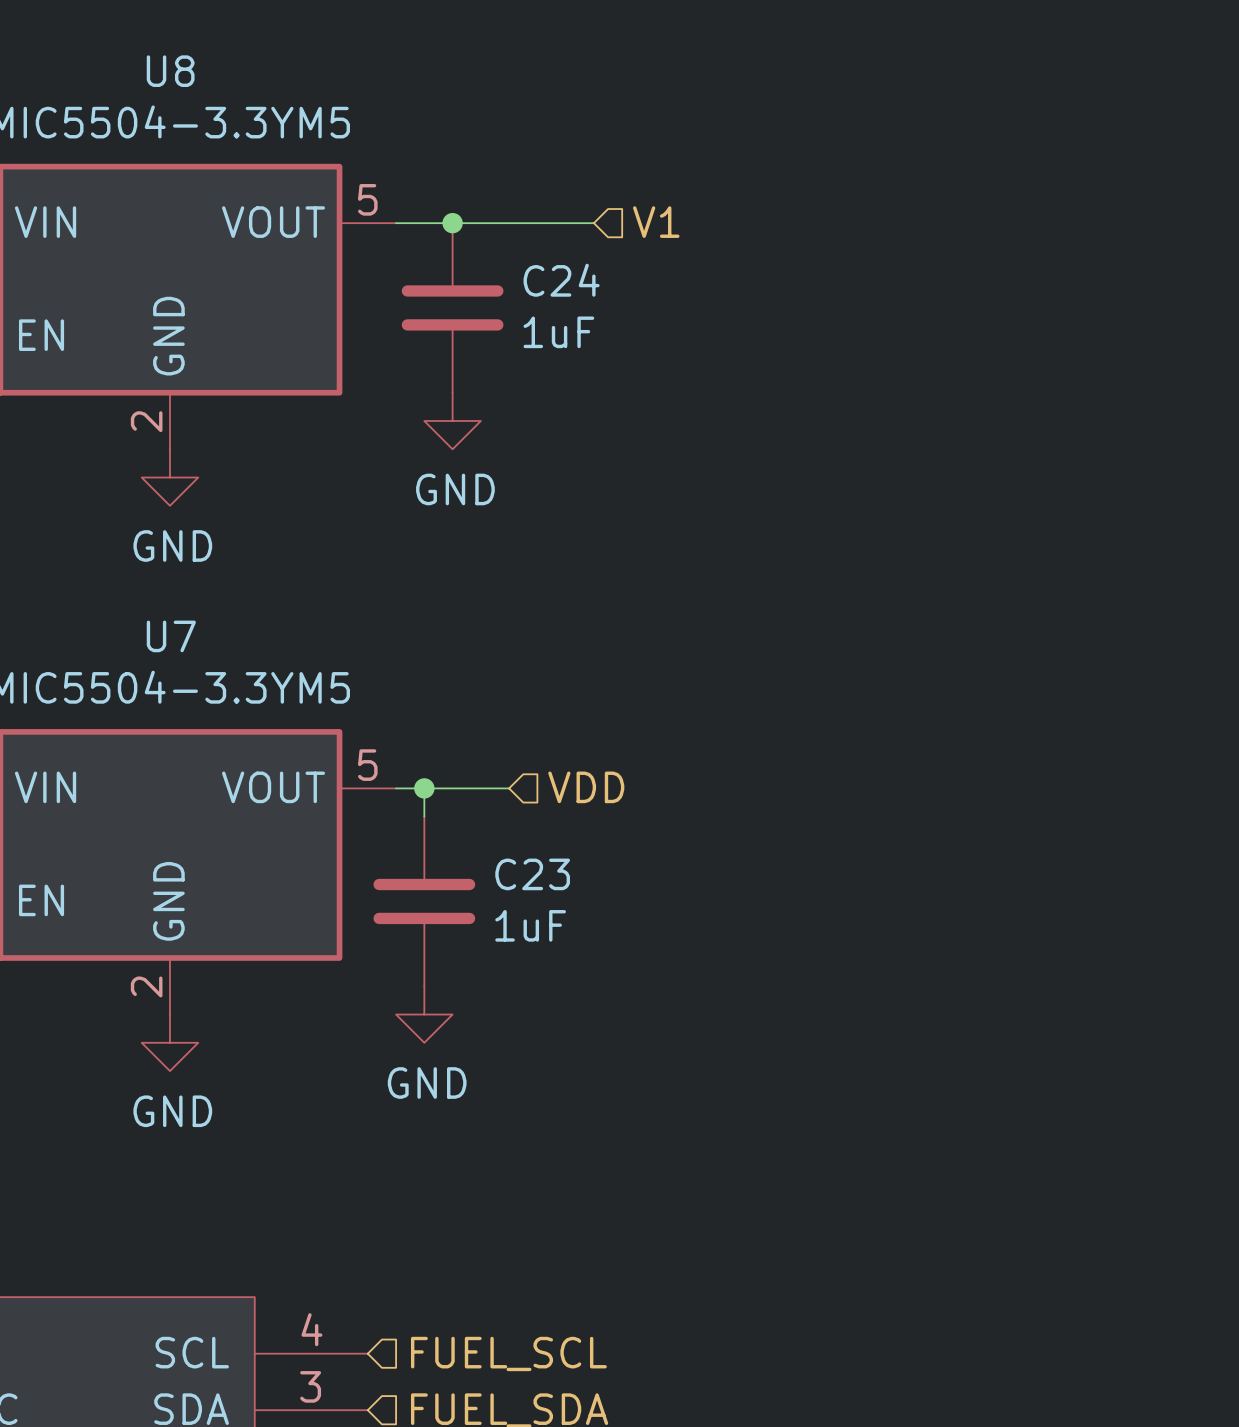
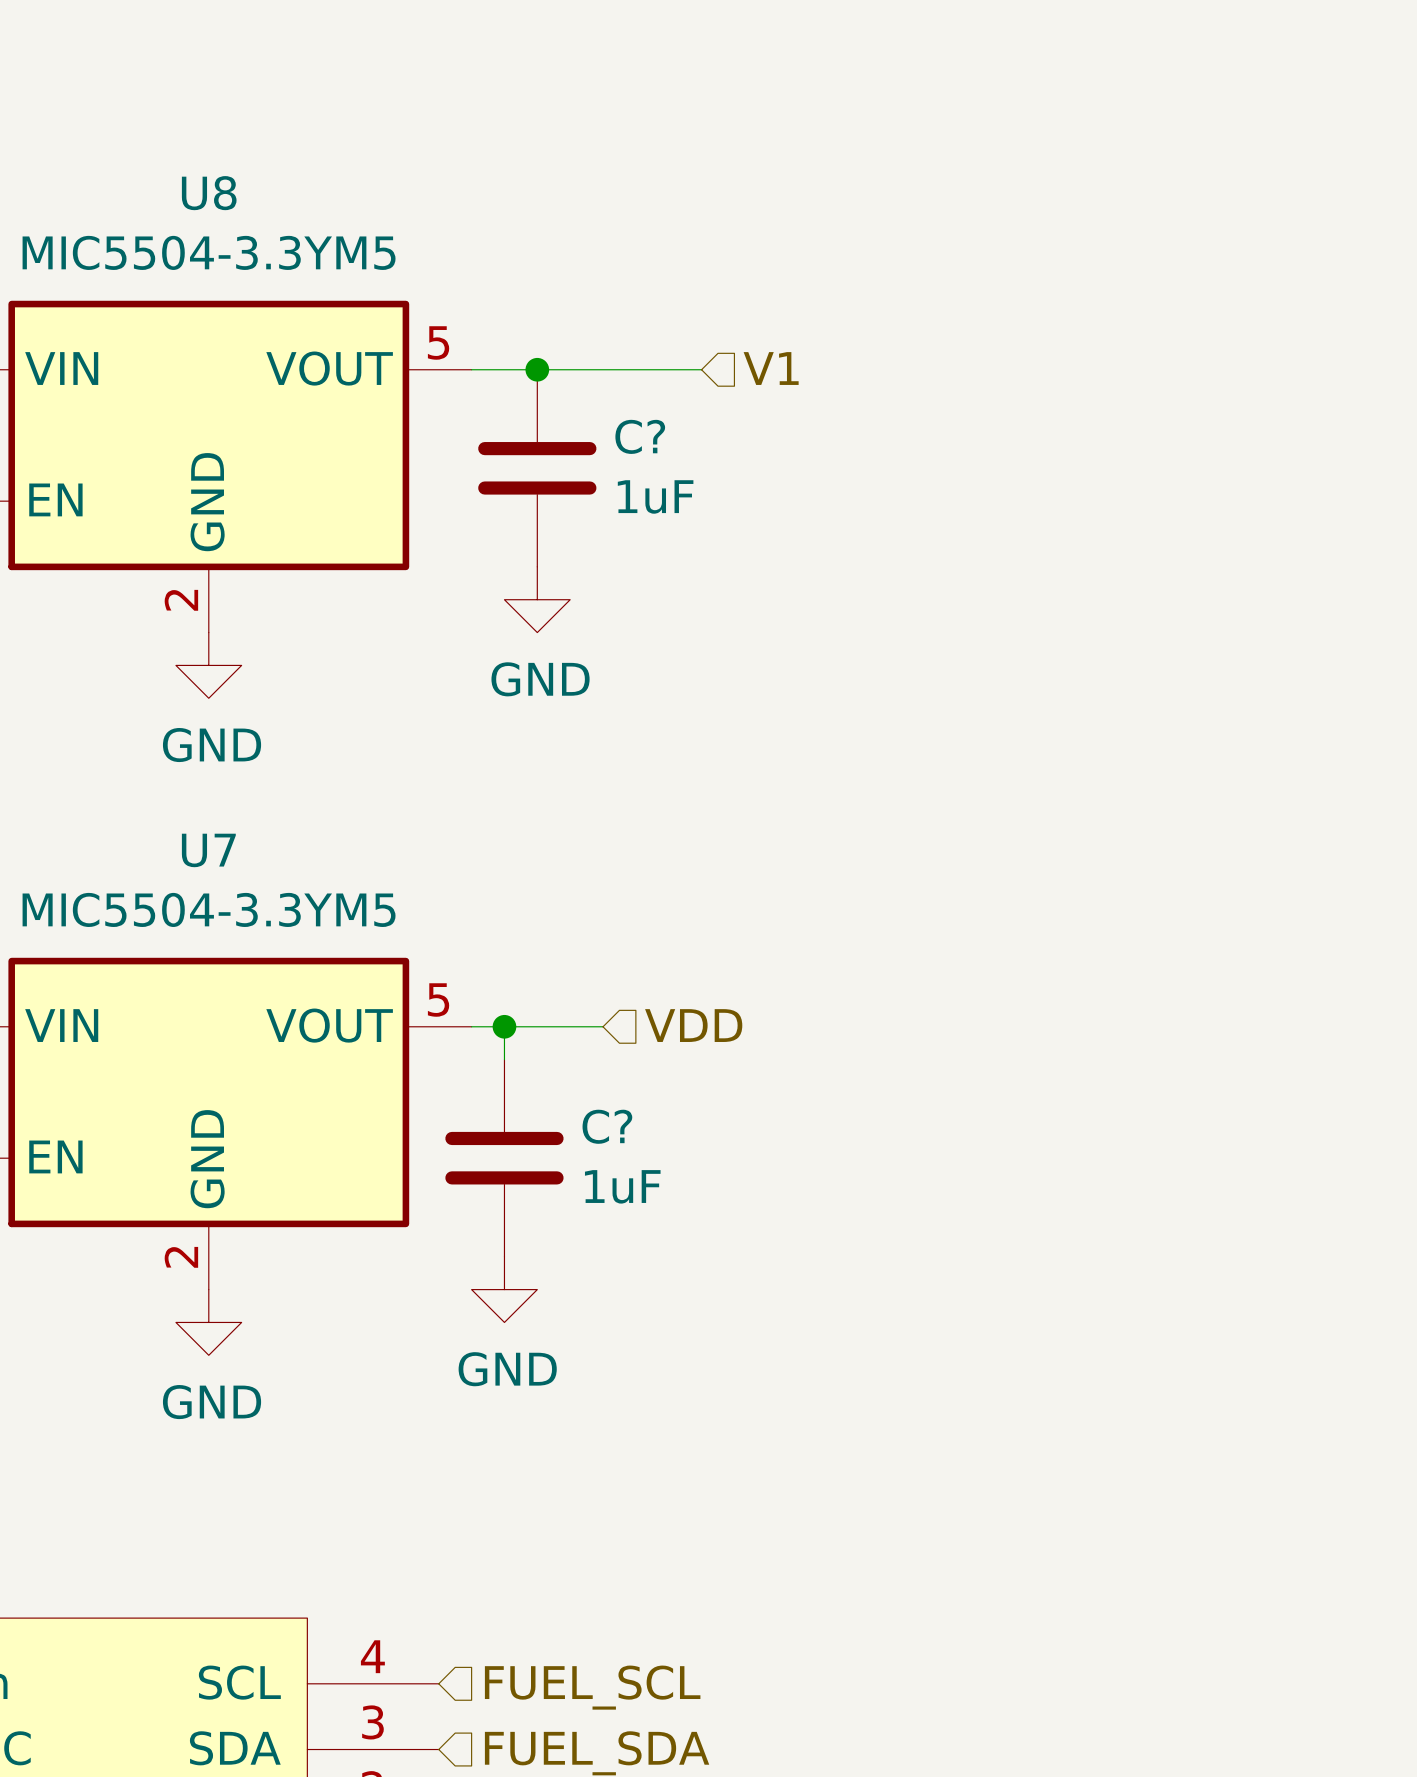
C24 name: C24 (561, 280) -> C? (640, 436)
C23 name: C23 (532, 874) -> C? (607, 1126)

